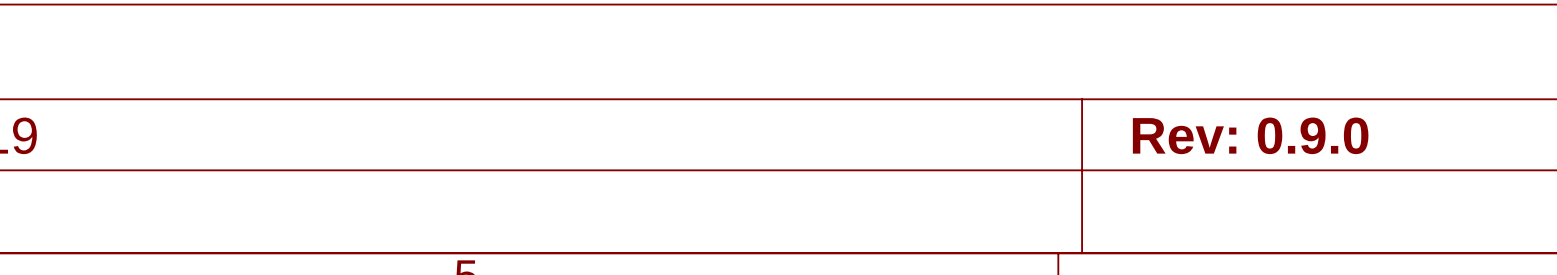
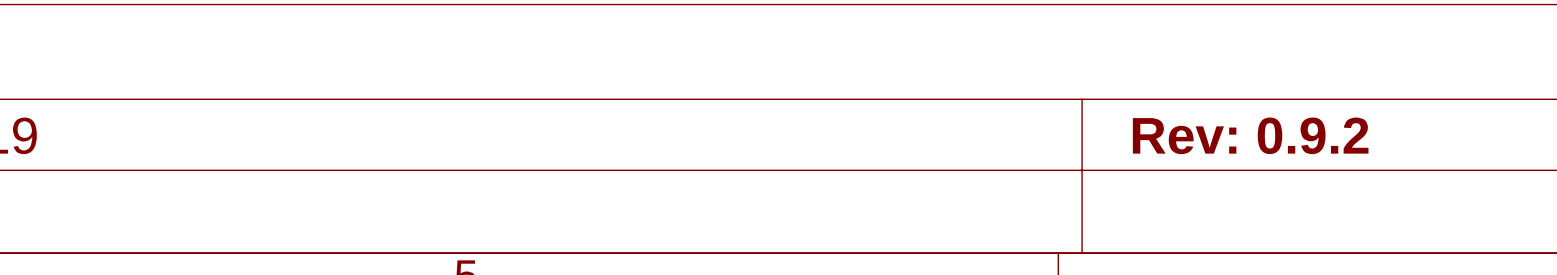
title block: Rev: 0.9.0 (1250, 135) -> Rev: 0.9.2 (1250, 135)

